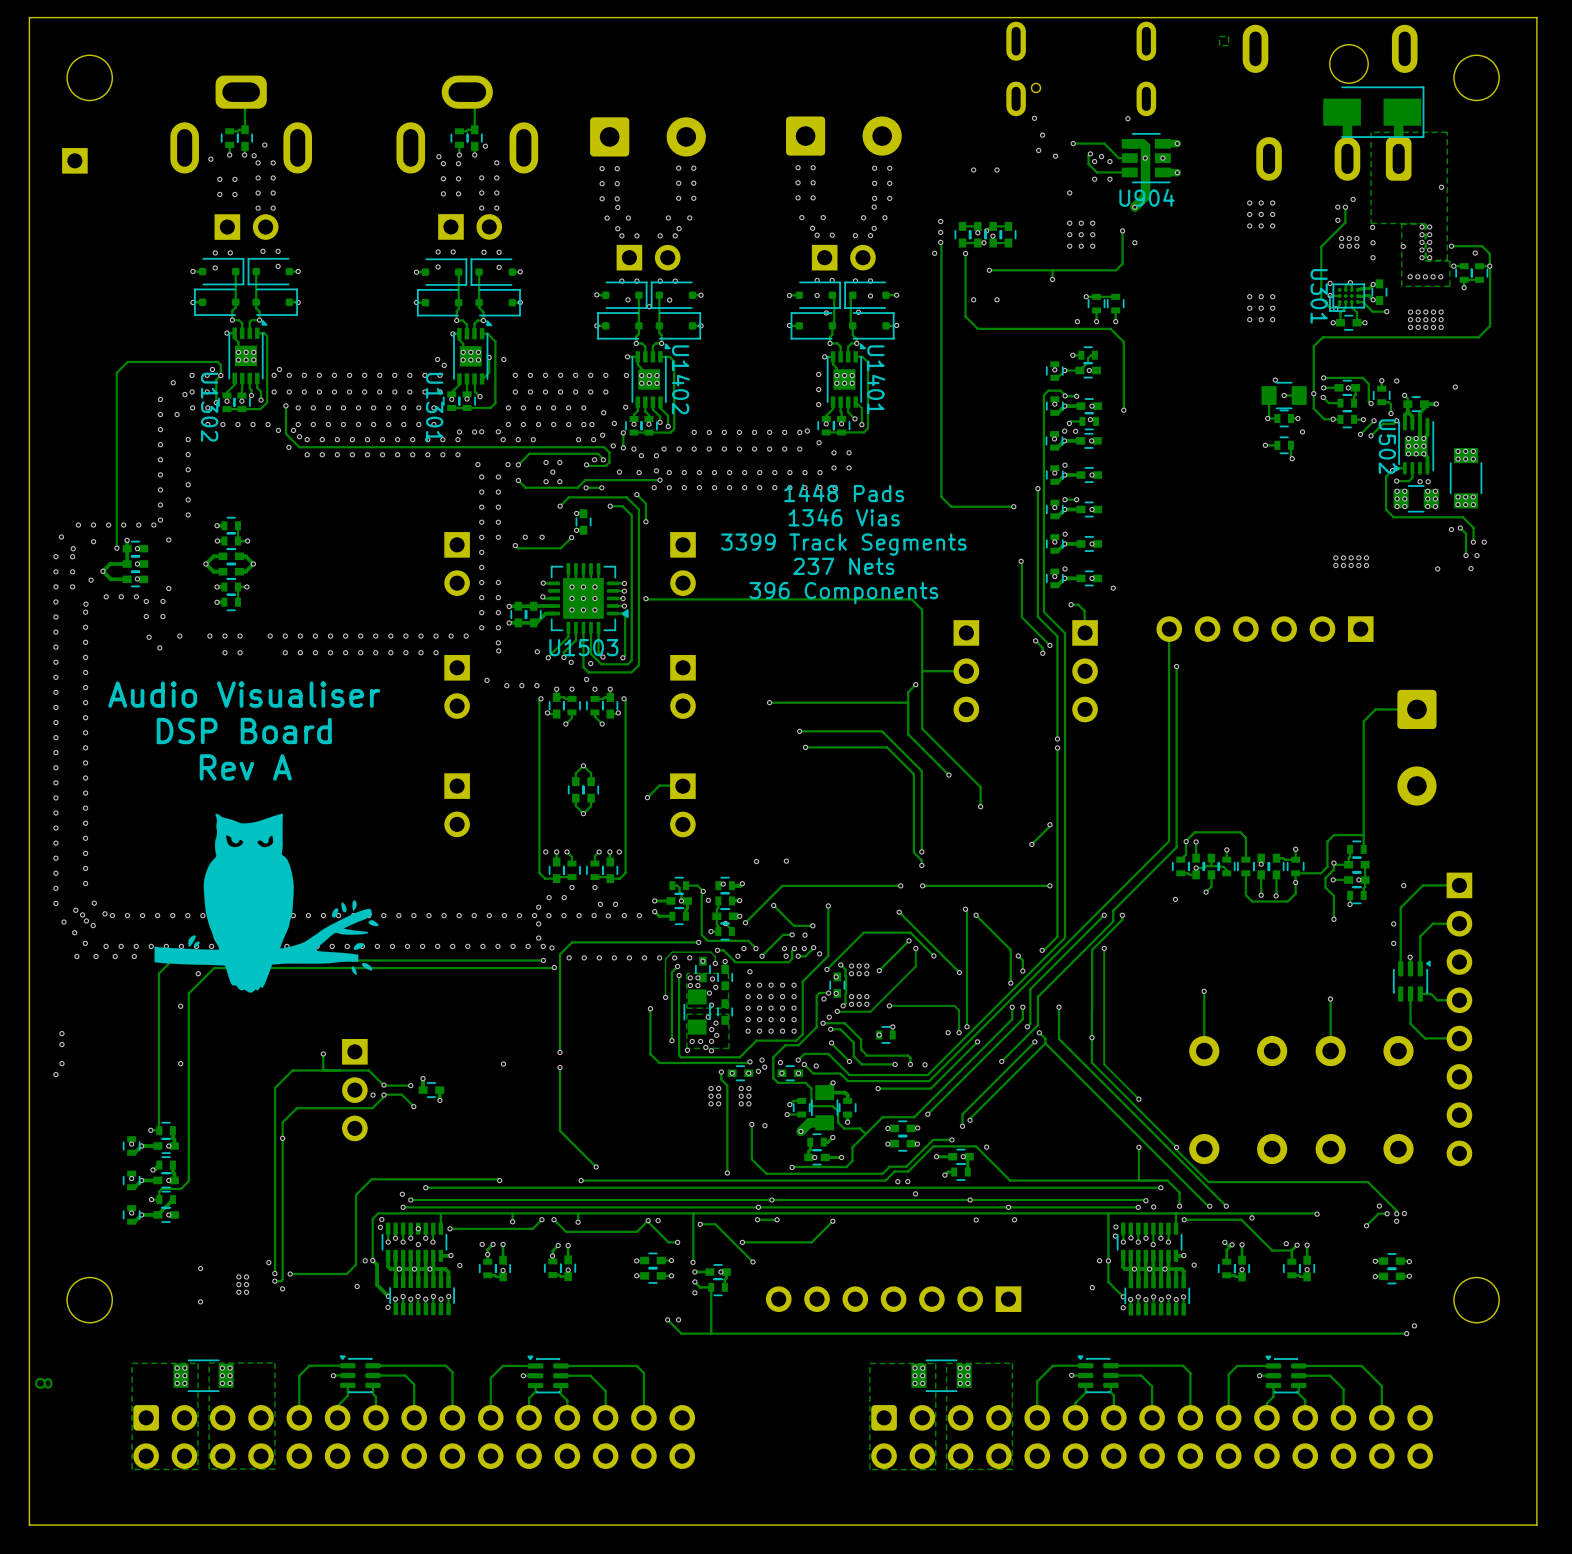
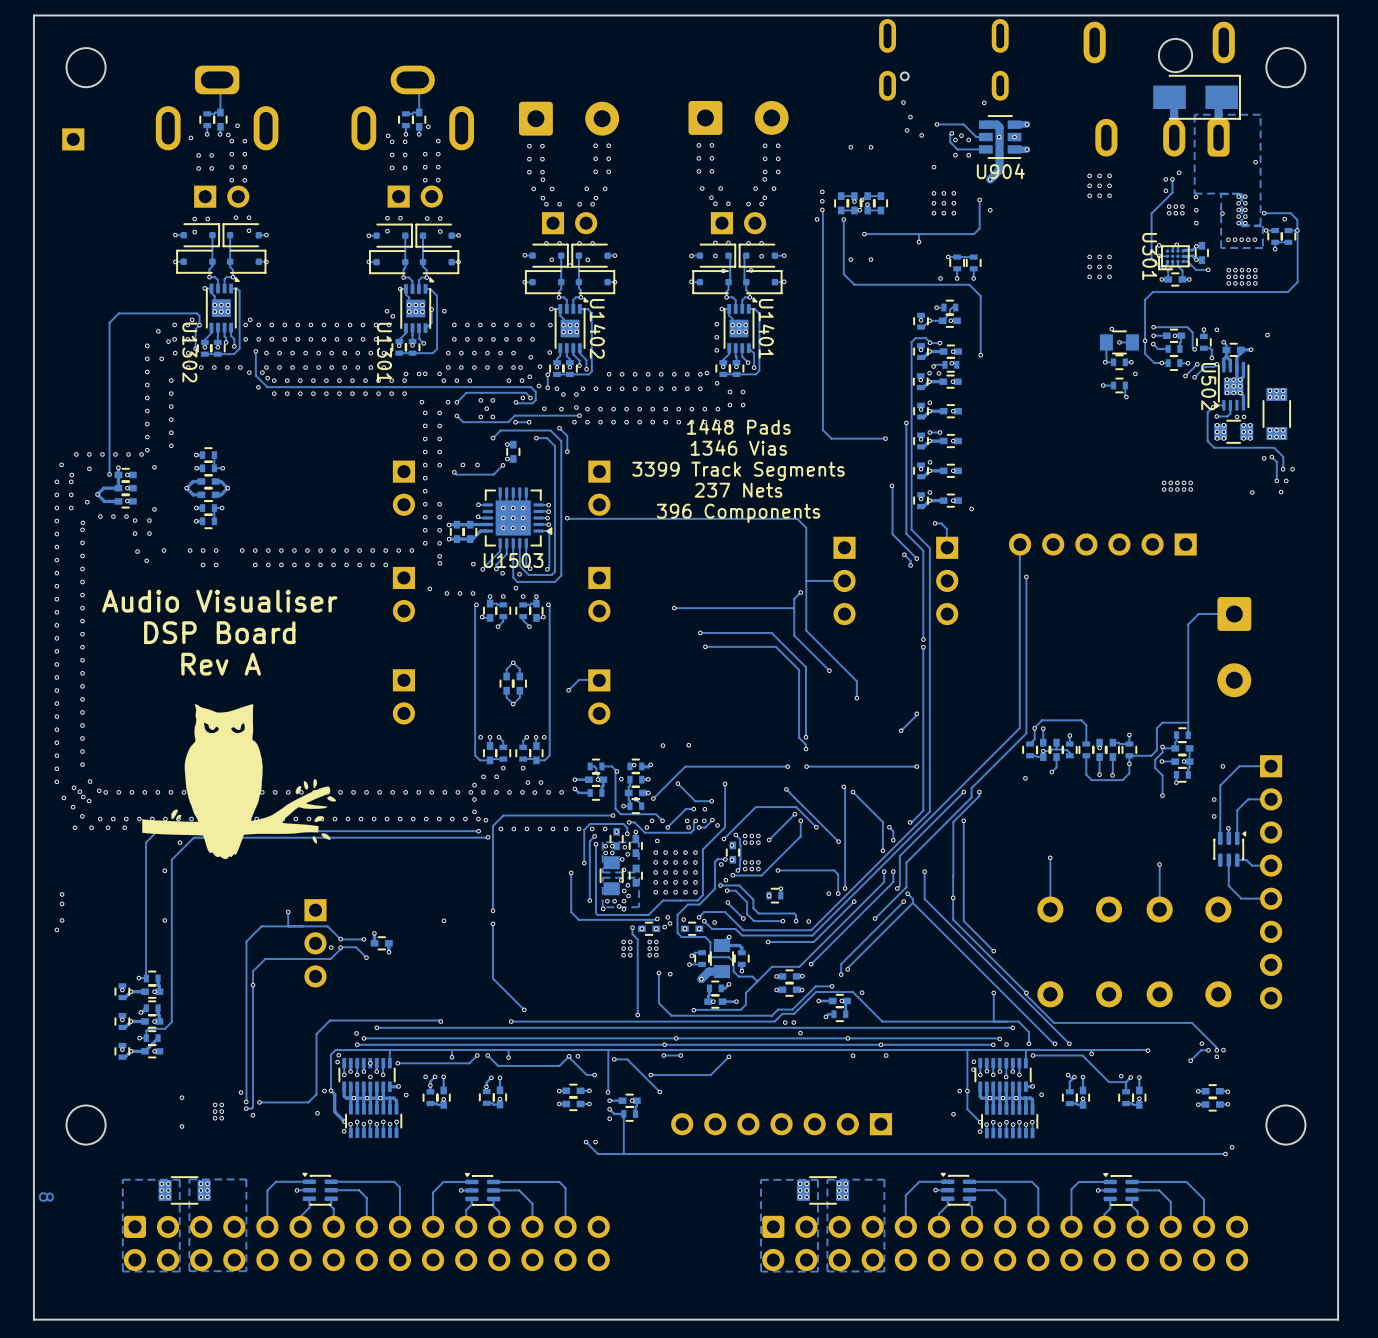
zone outline: (1228, 36) (1228, 45) (1219, 45) (1219, 36) (1228, 36) -> none

